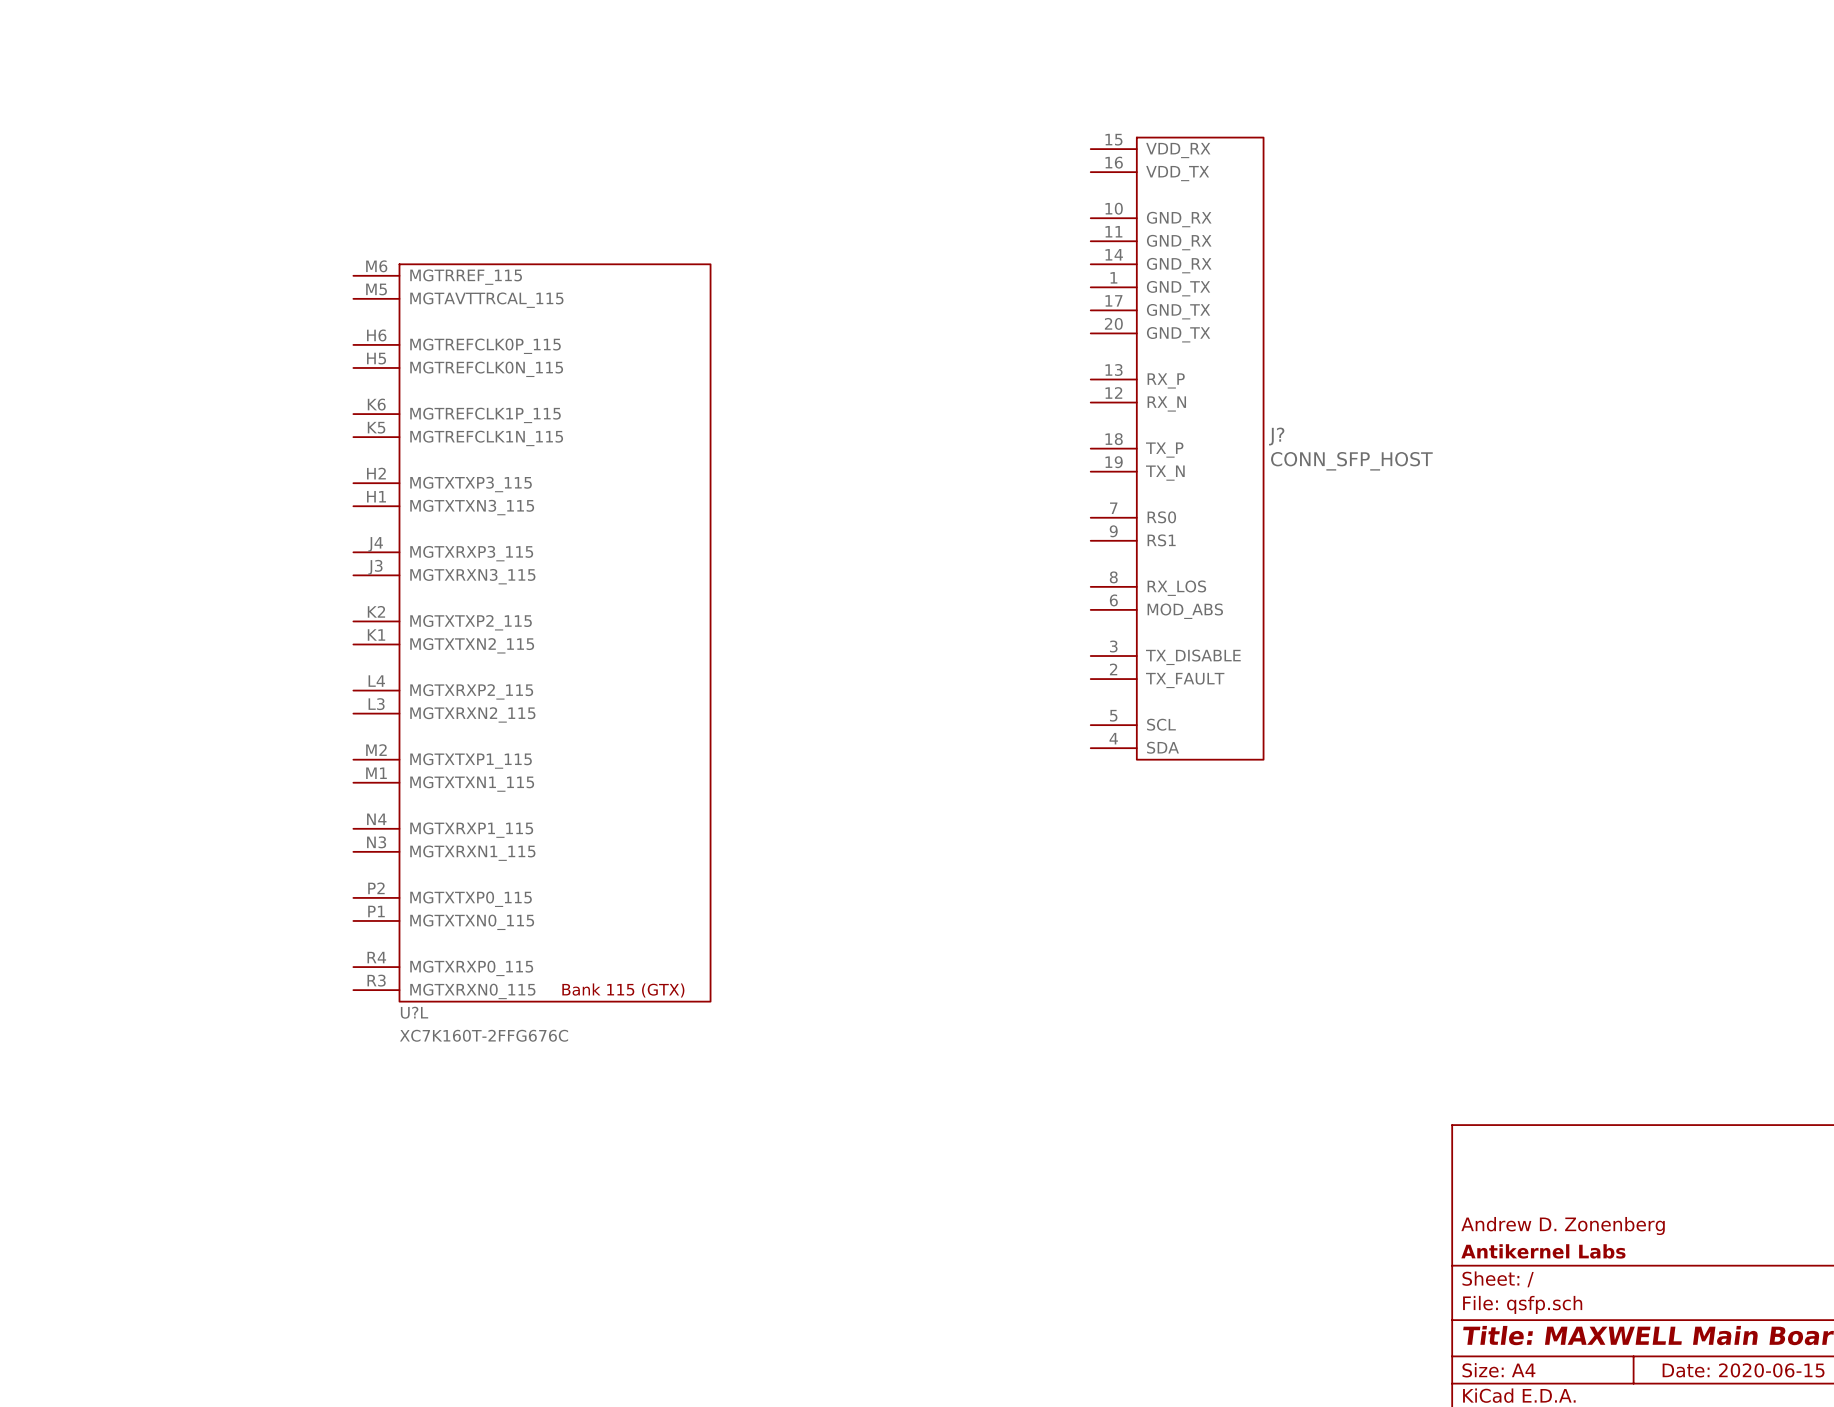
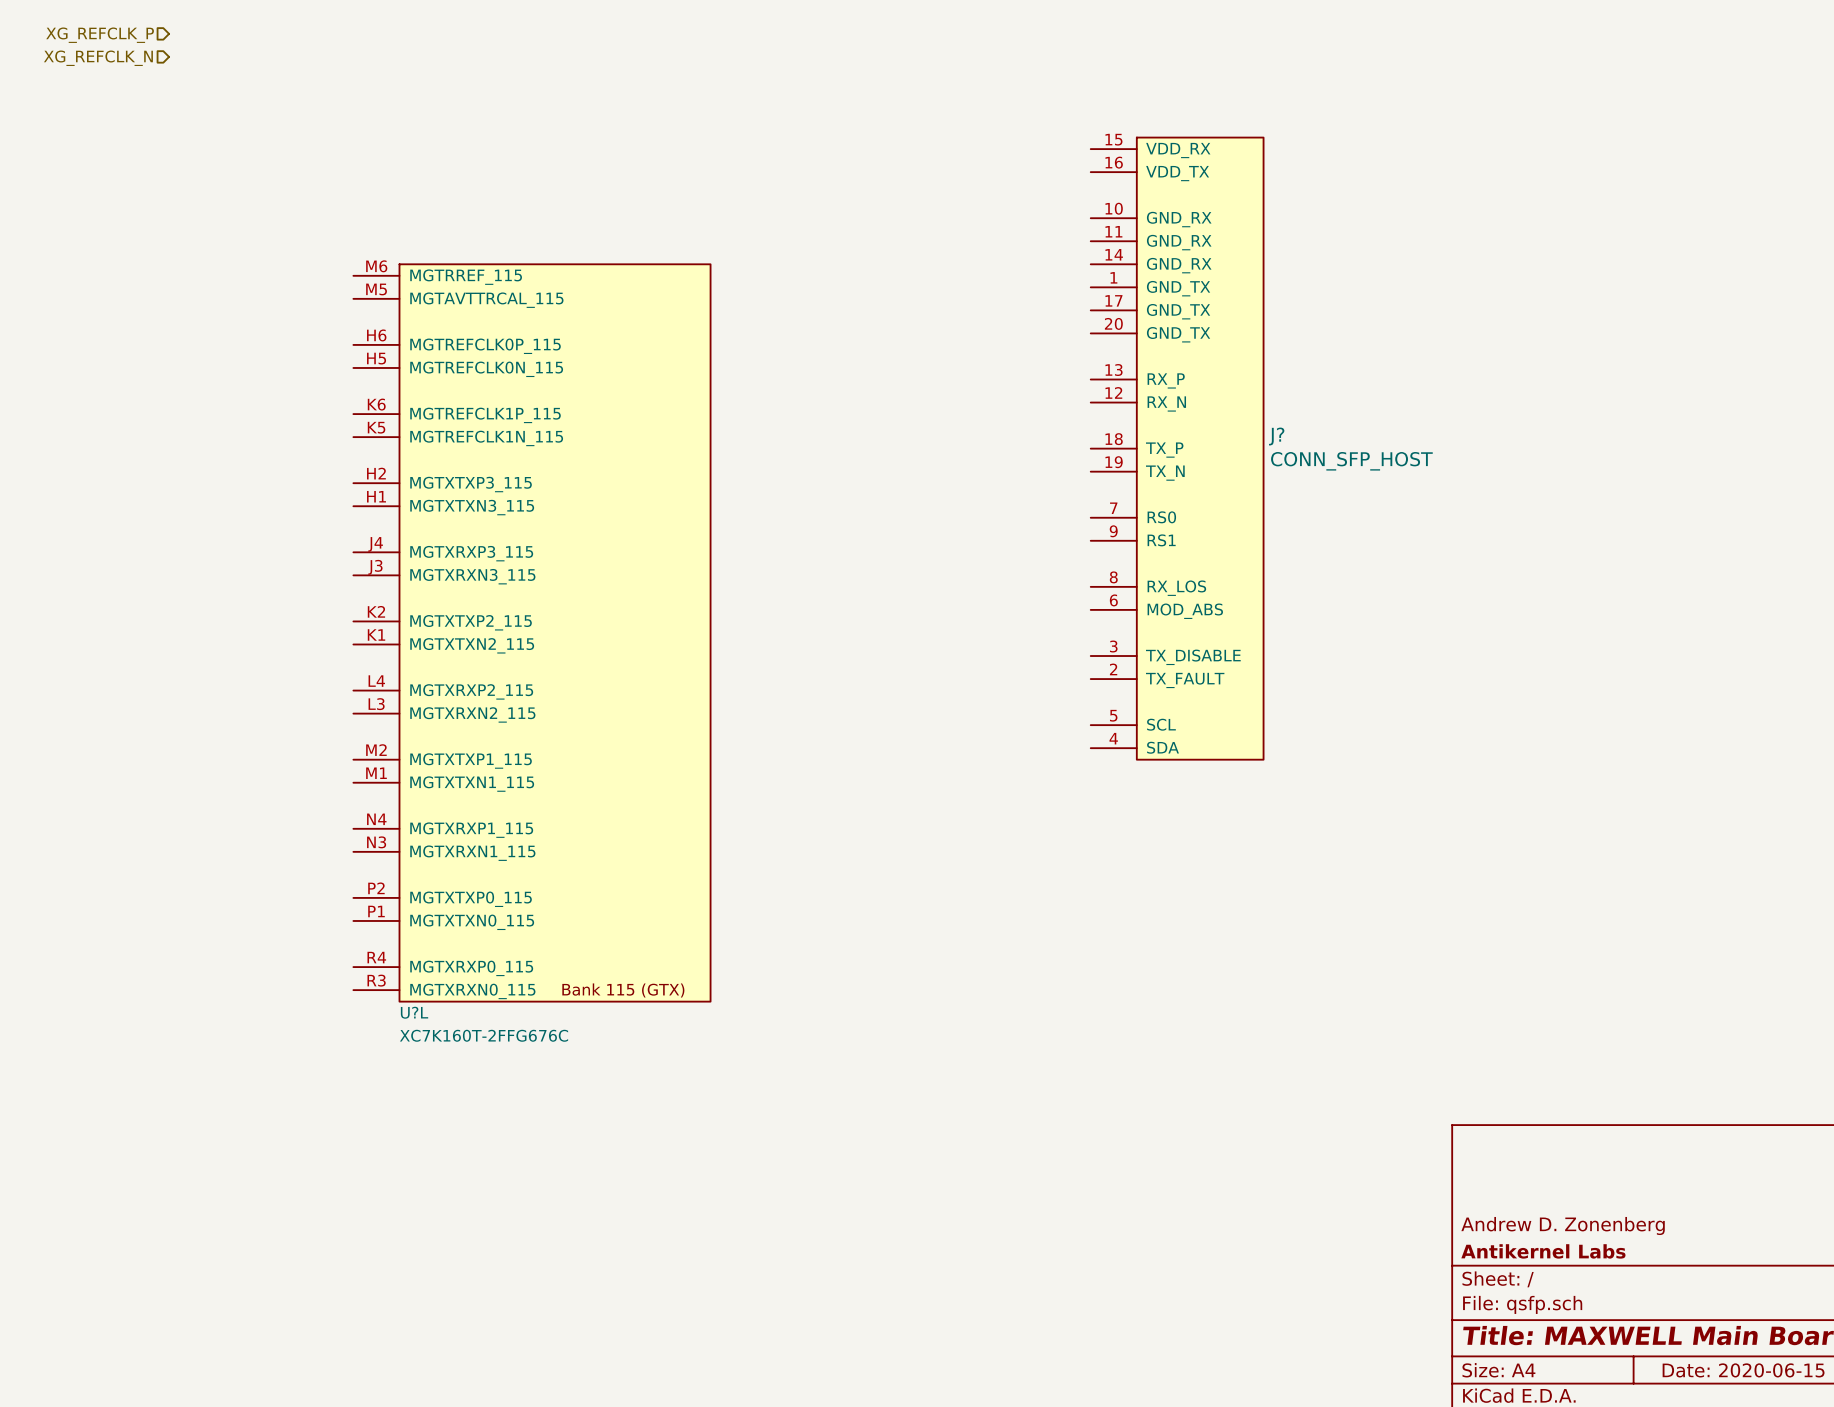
hierarchical label: none -> XG_REFCLK_P (100, 35)
hierarchical label: none -> XG_REFCLK_N (98, 58)

